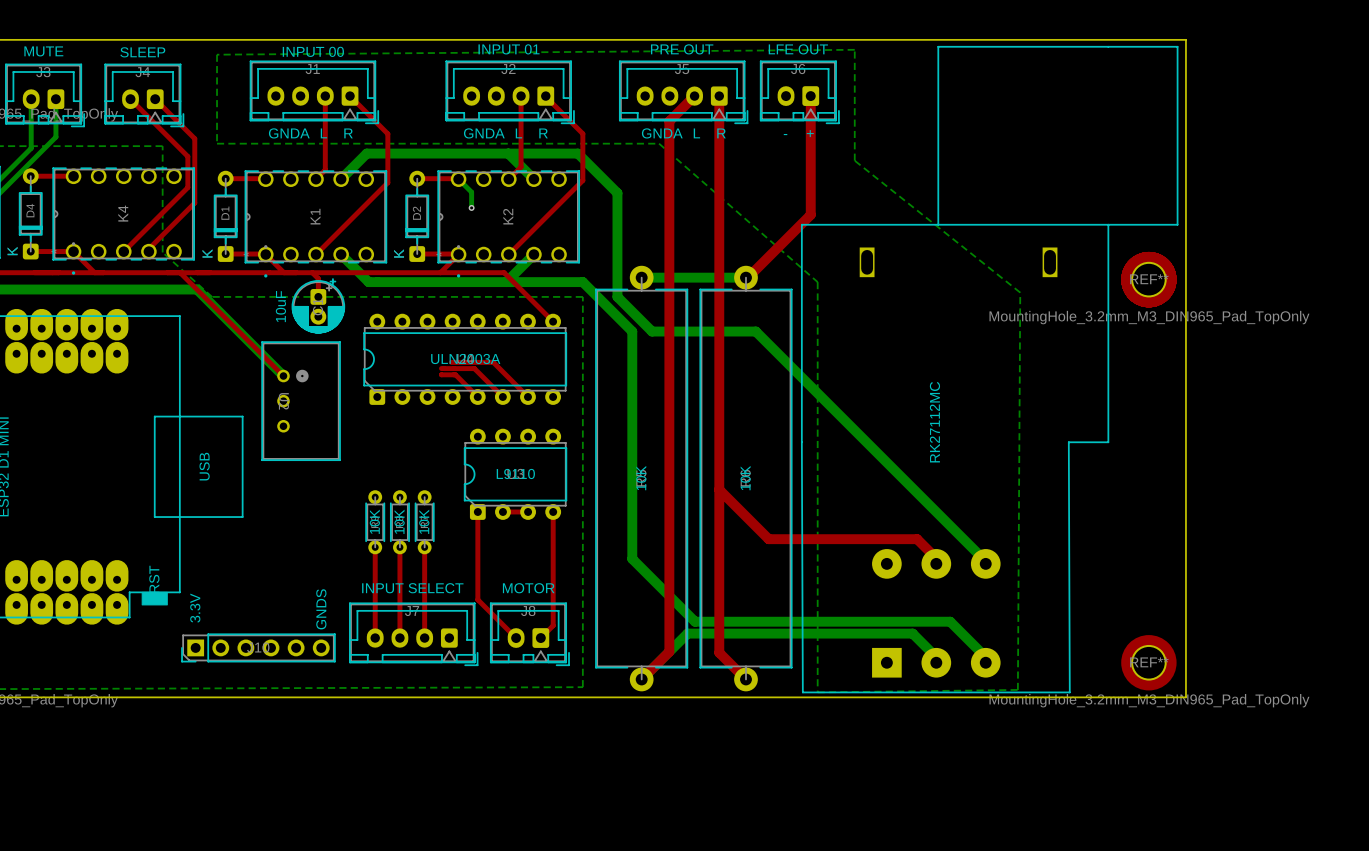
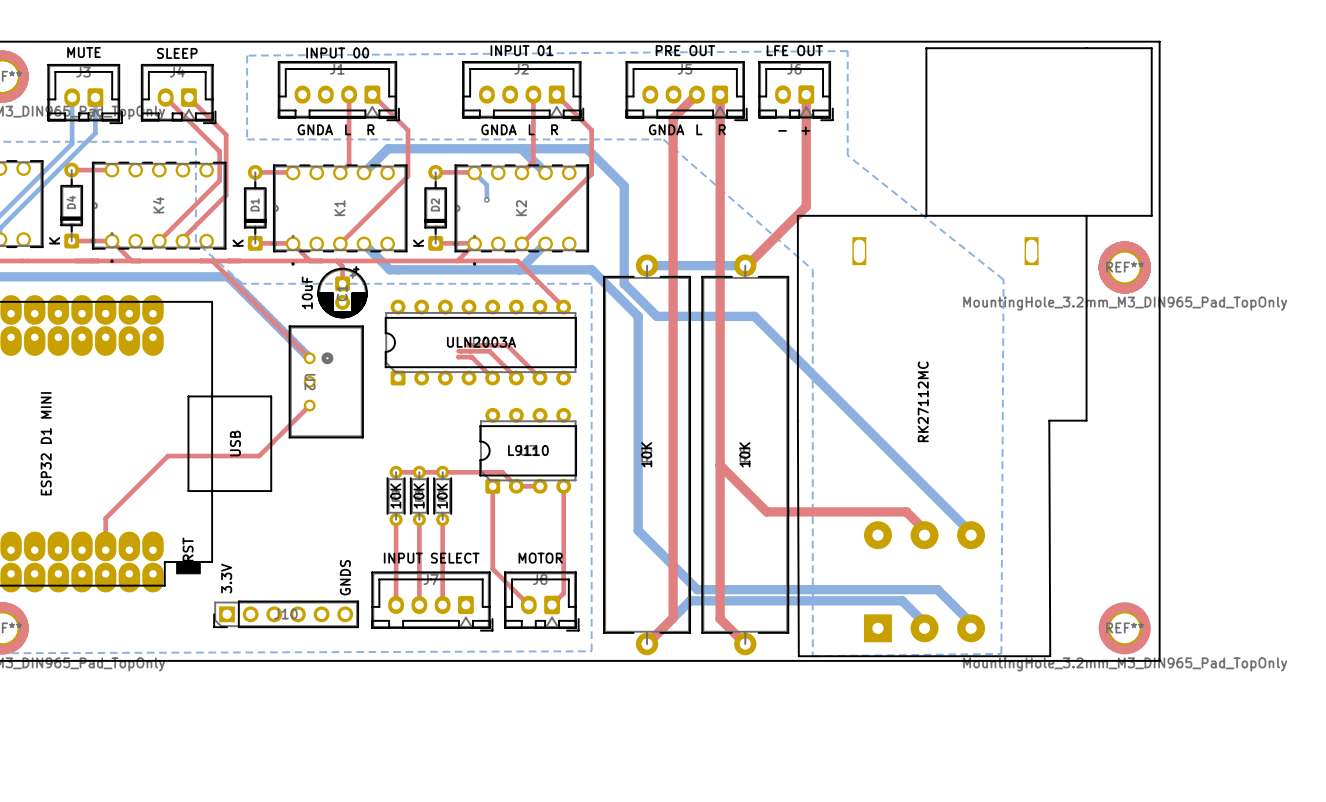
top track: none -> (309, 405) (259, 456) (167, 456) (105, 518) (105, 550)
top track: none -> (396, 472) (502, 472) (516, 486)

